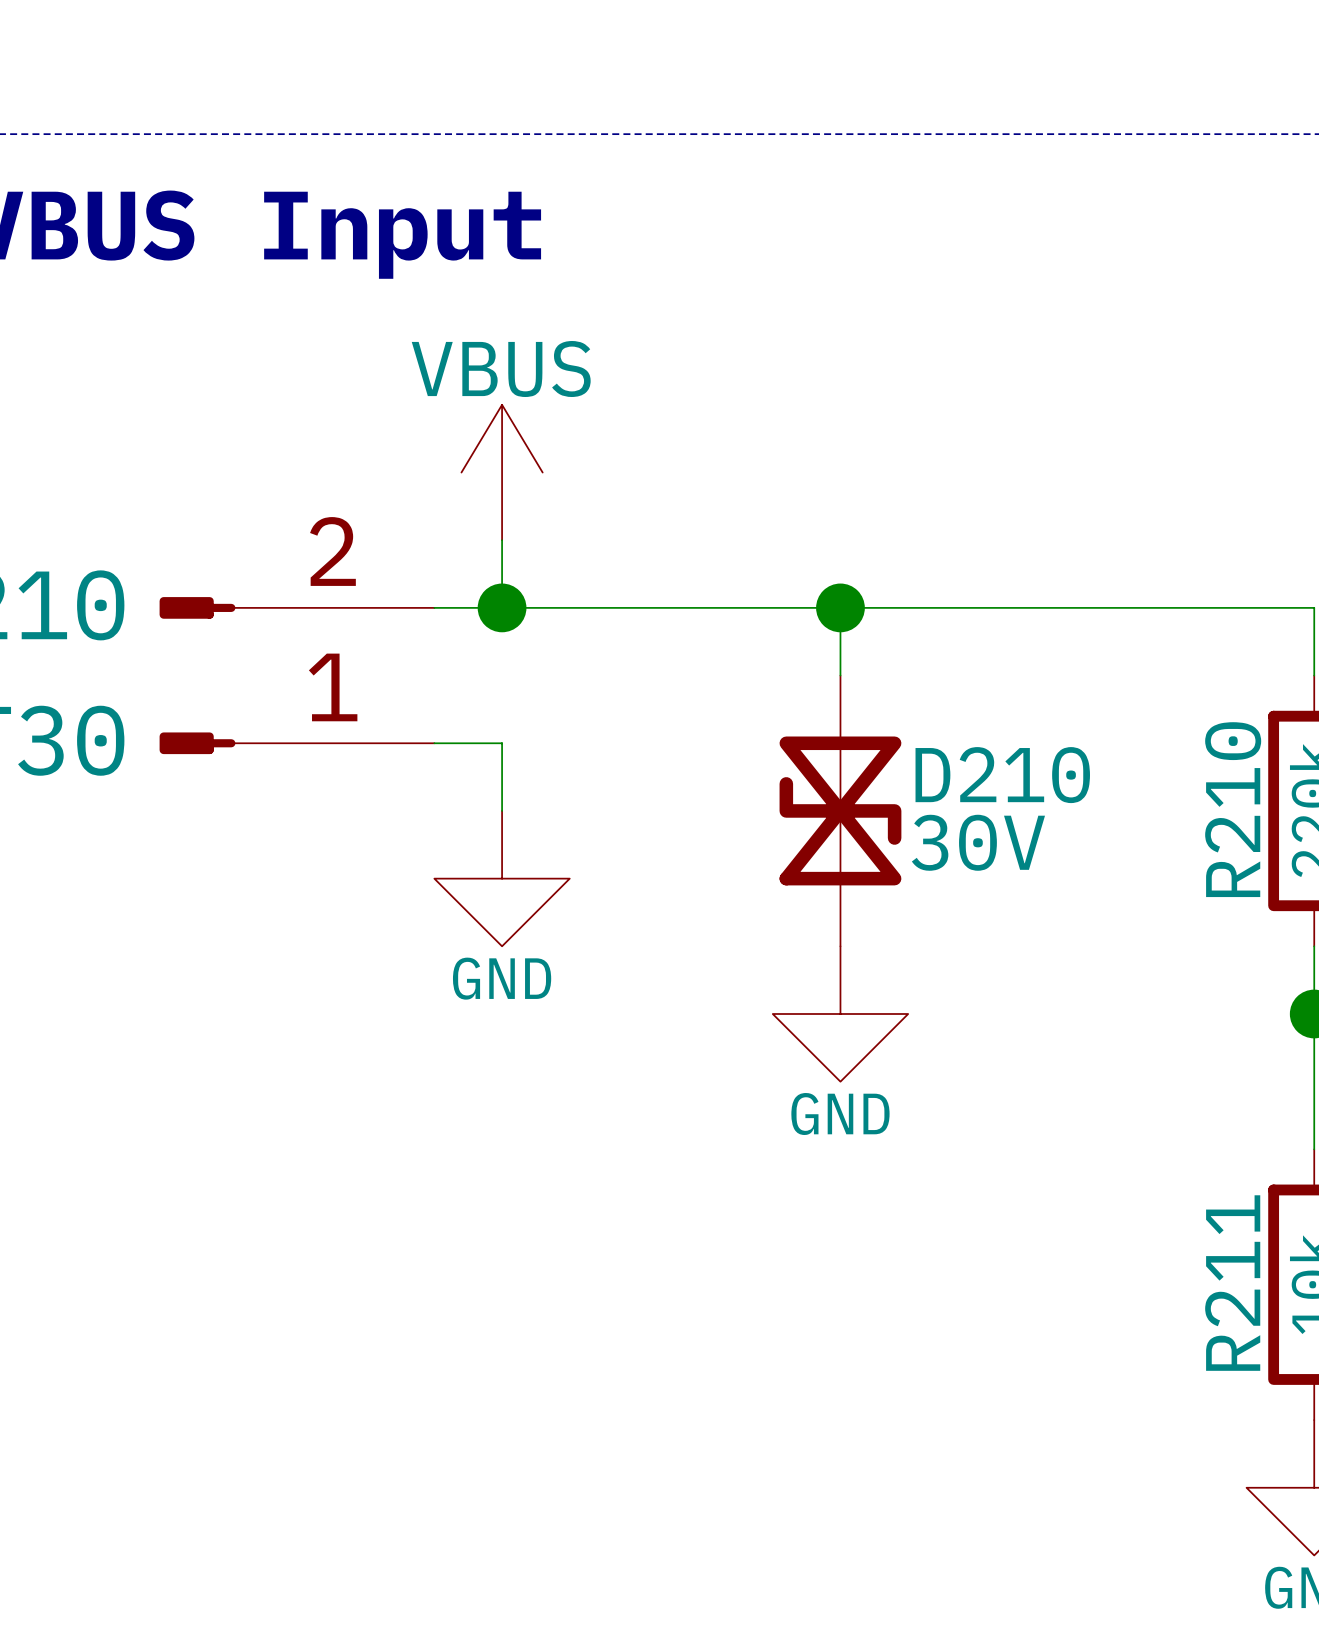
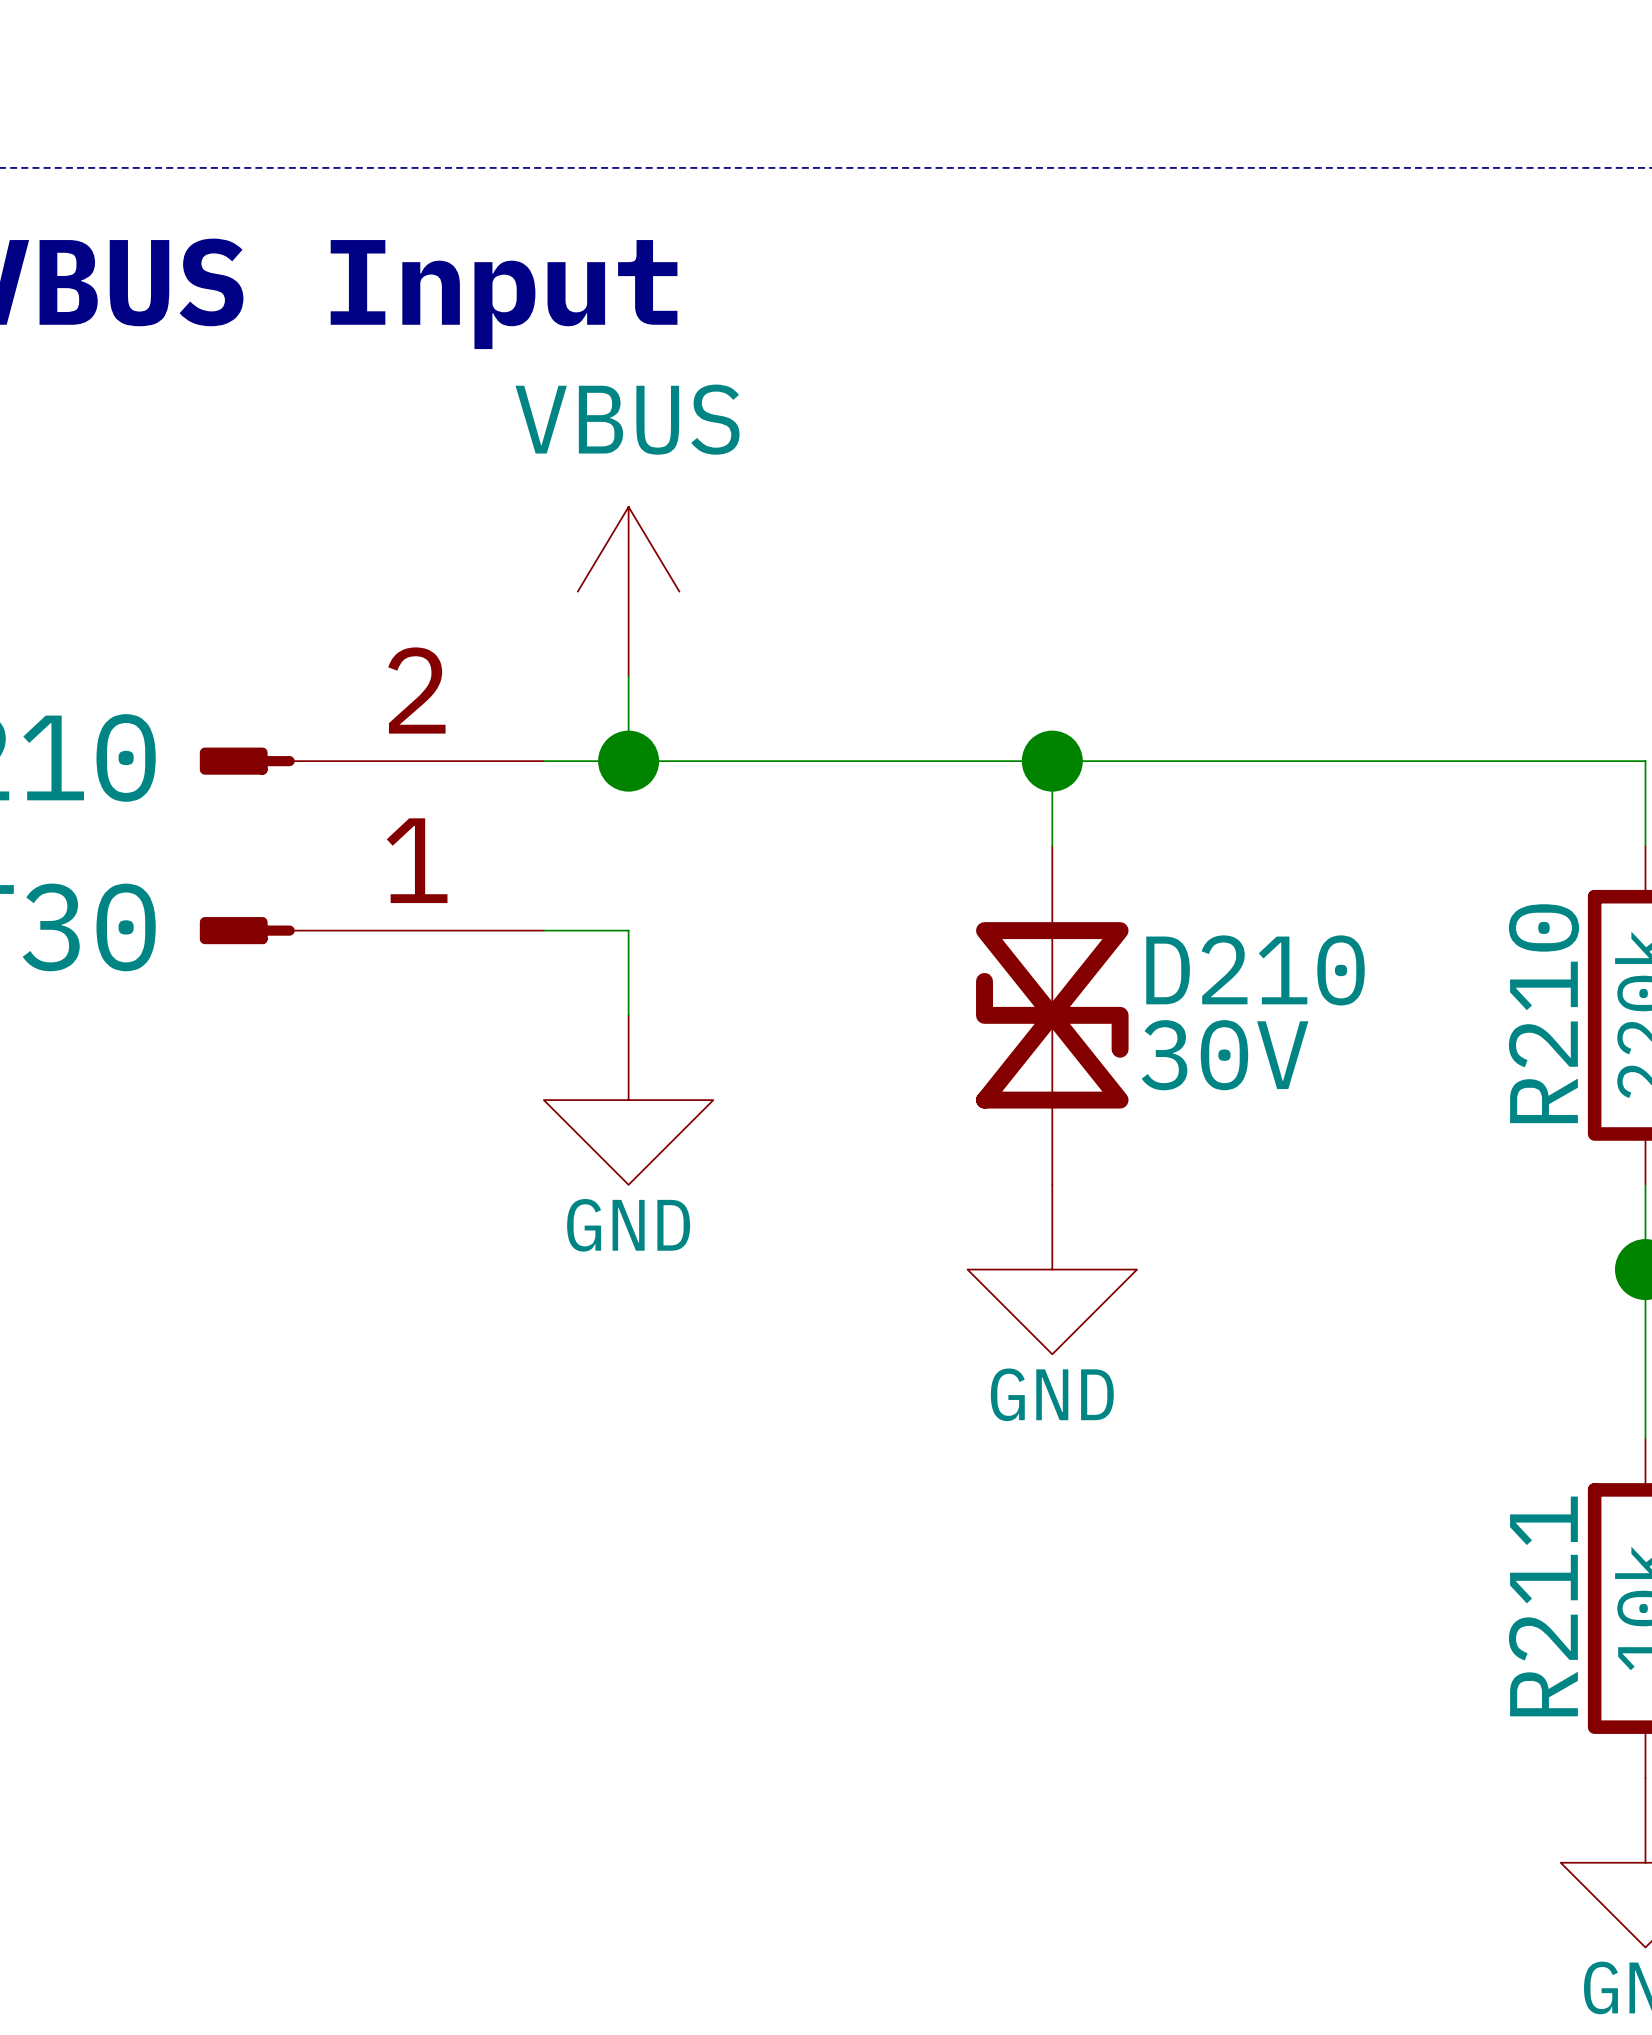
power symbol text position: VBUS (501, 369) -> VBUS (627, 419)

